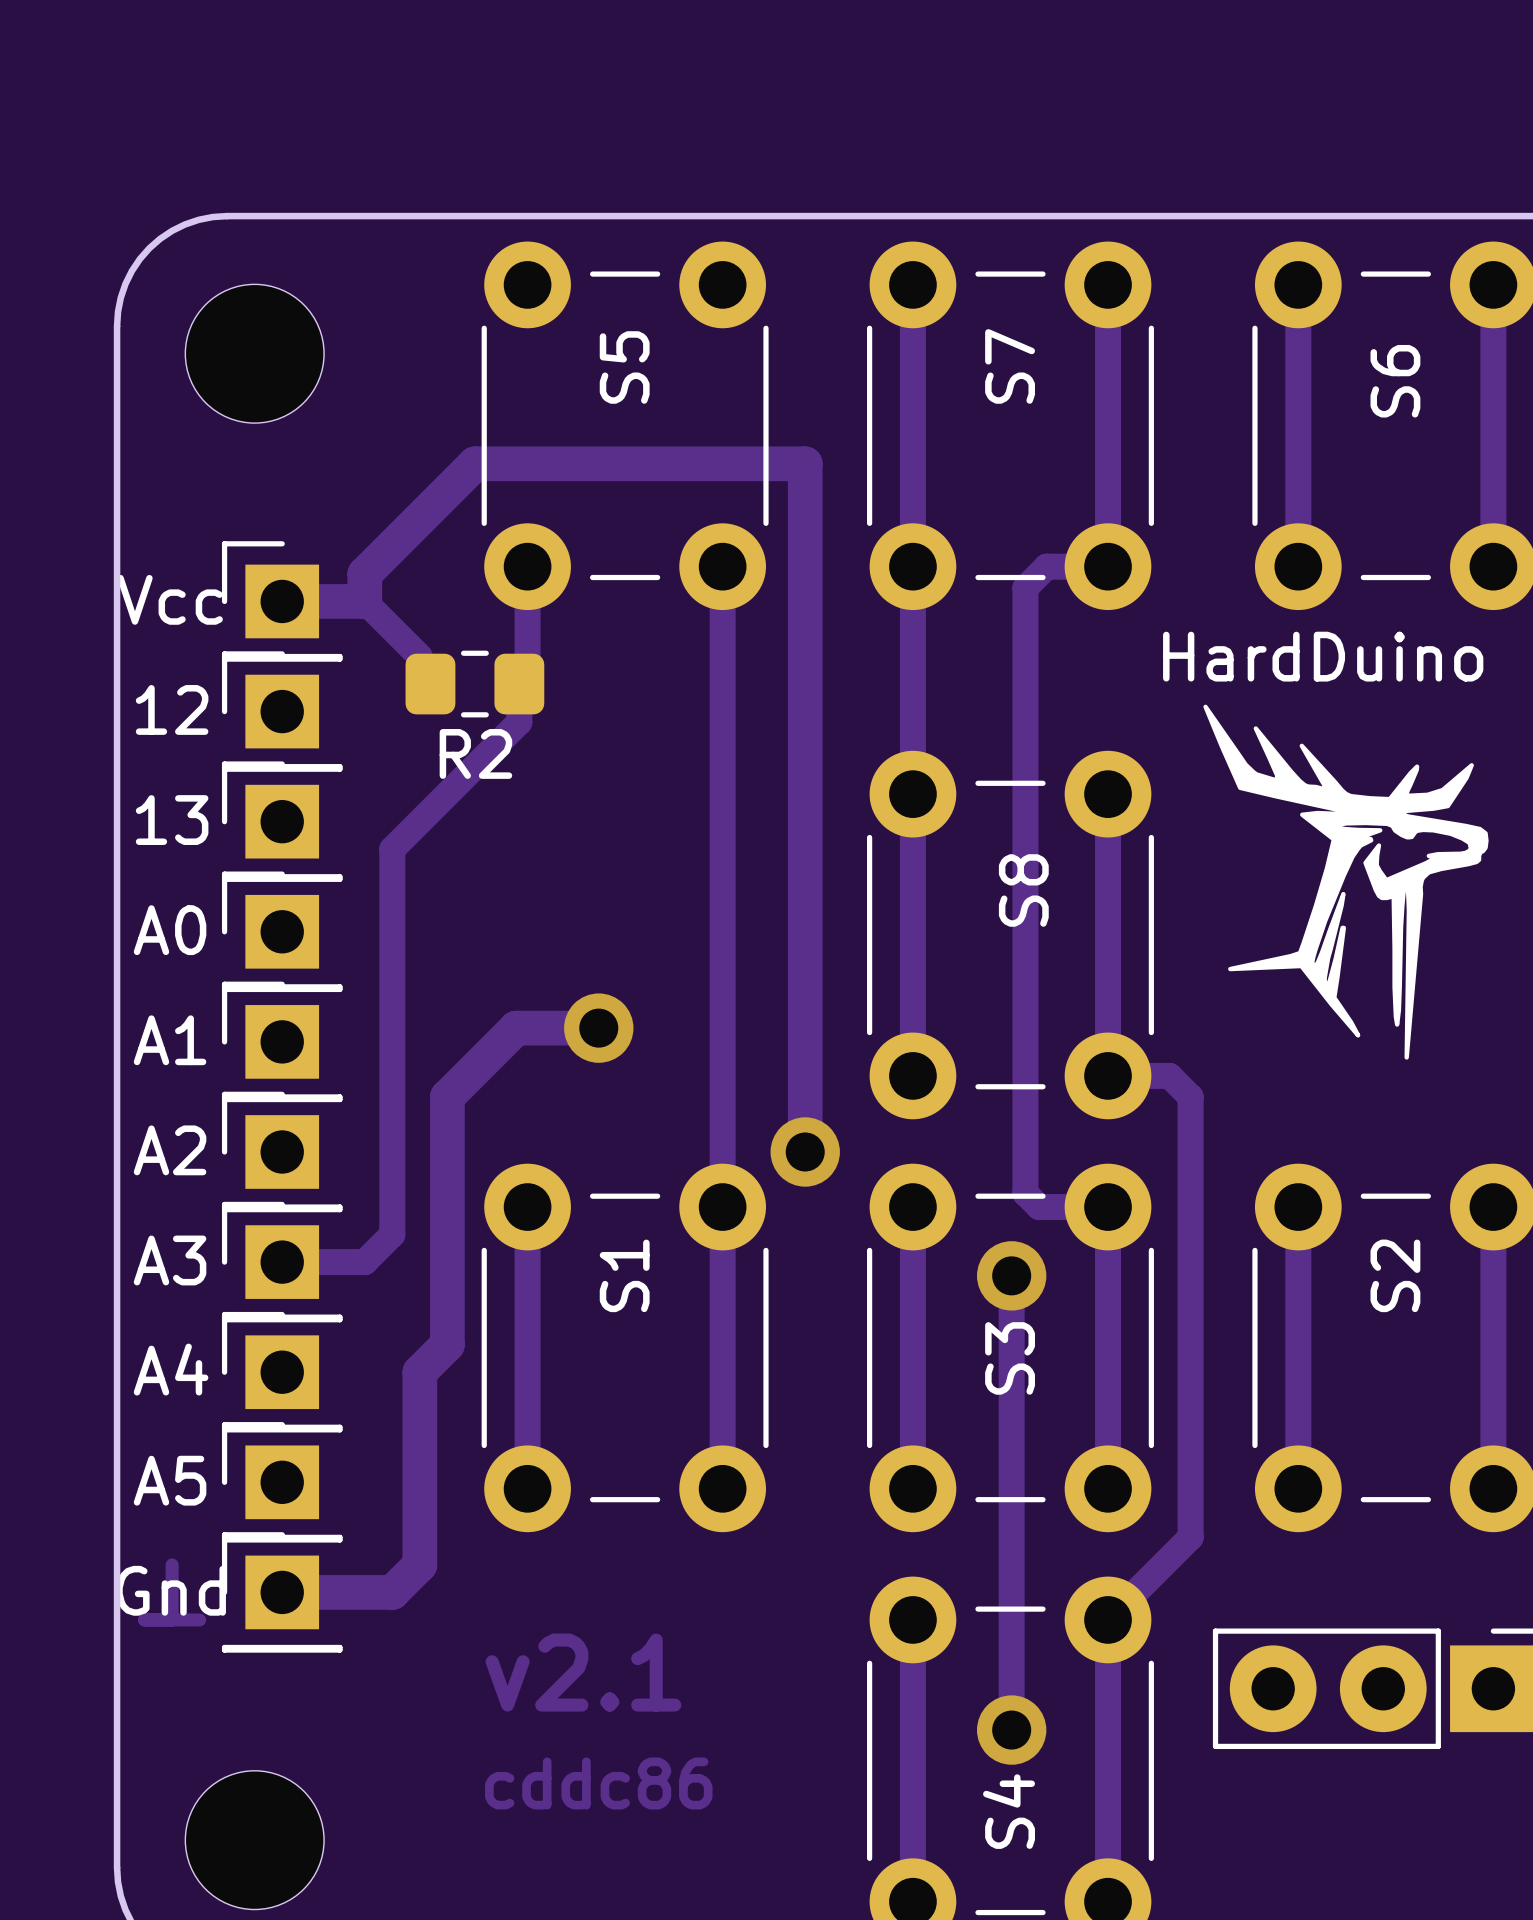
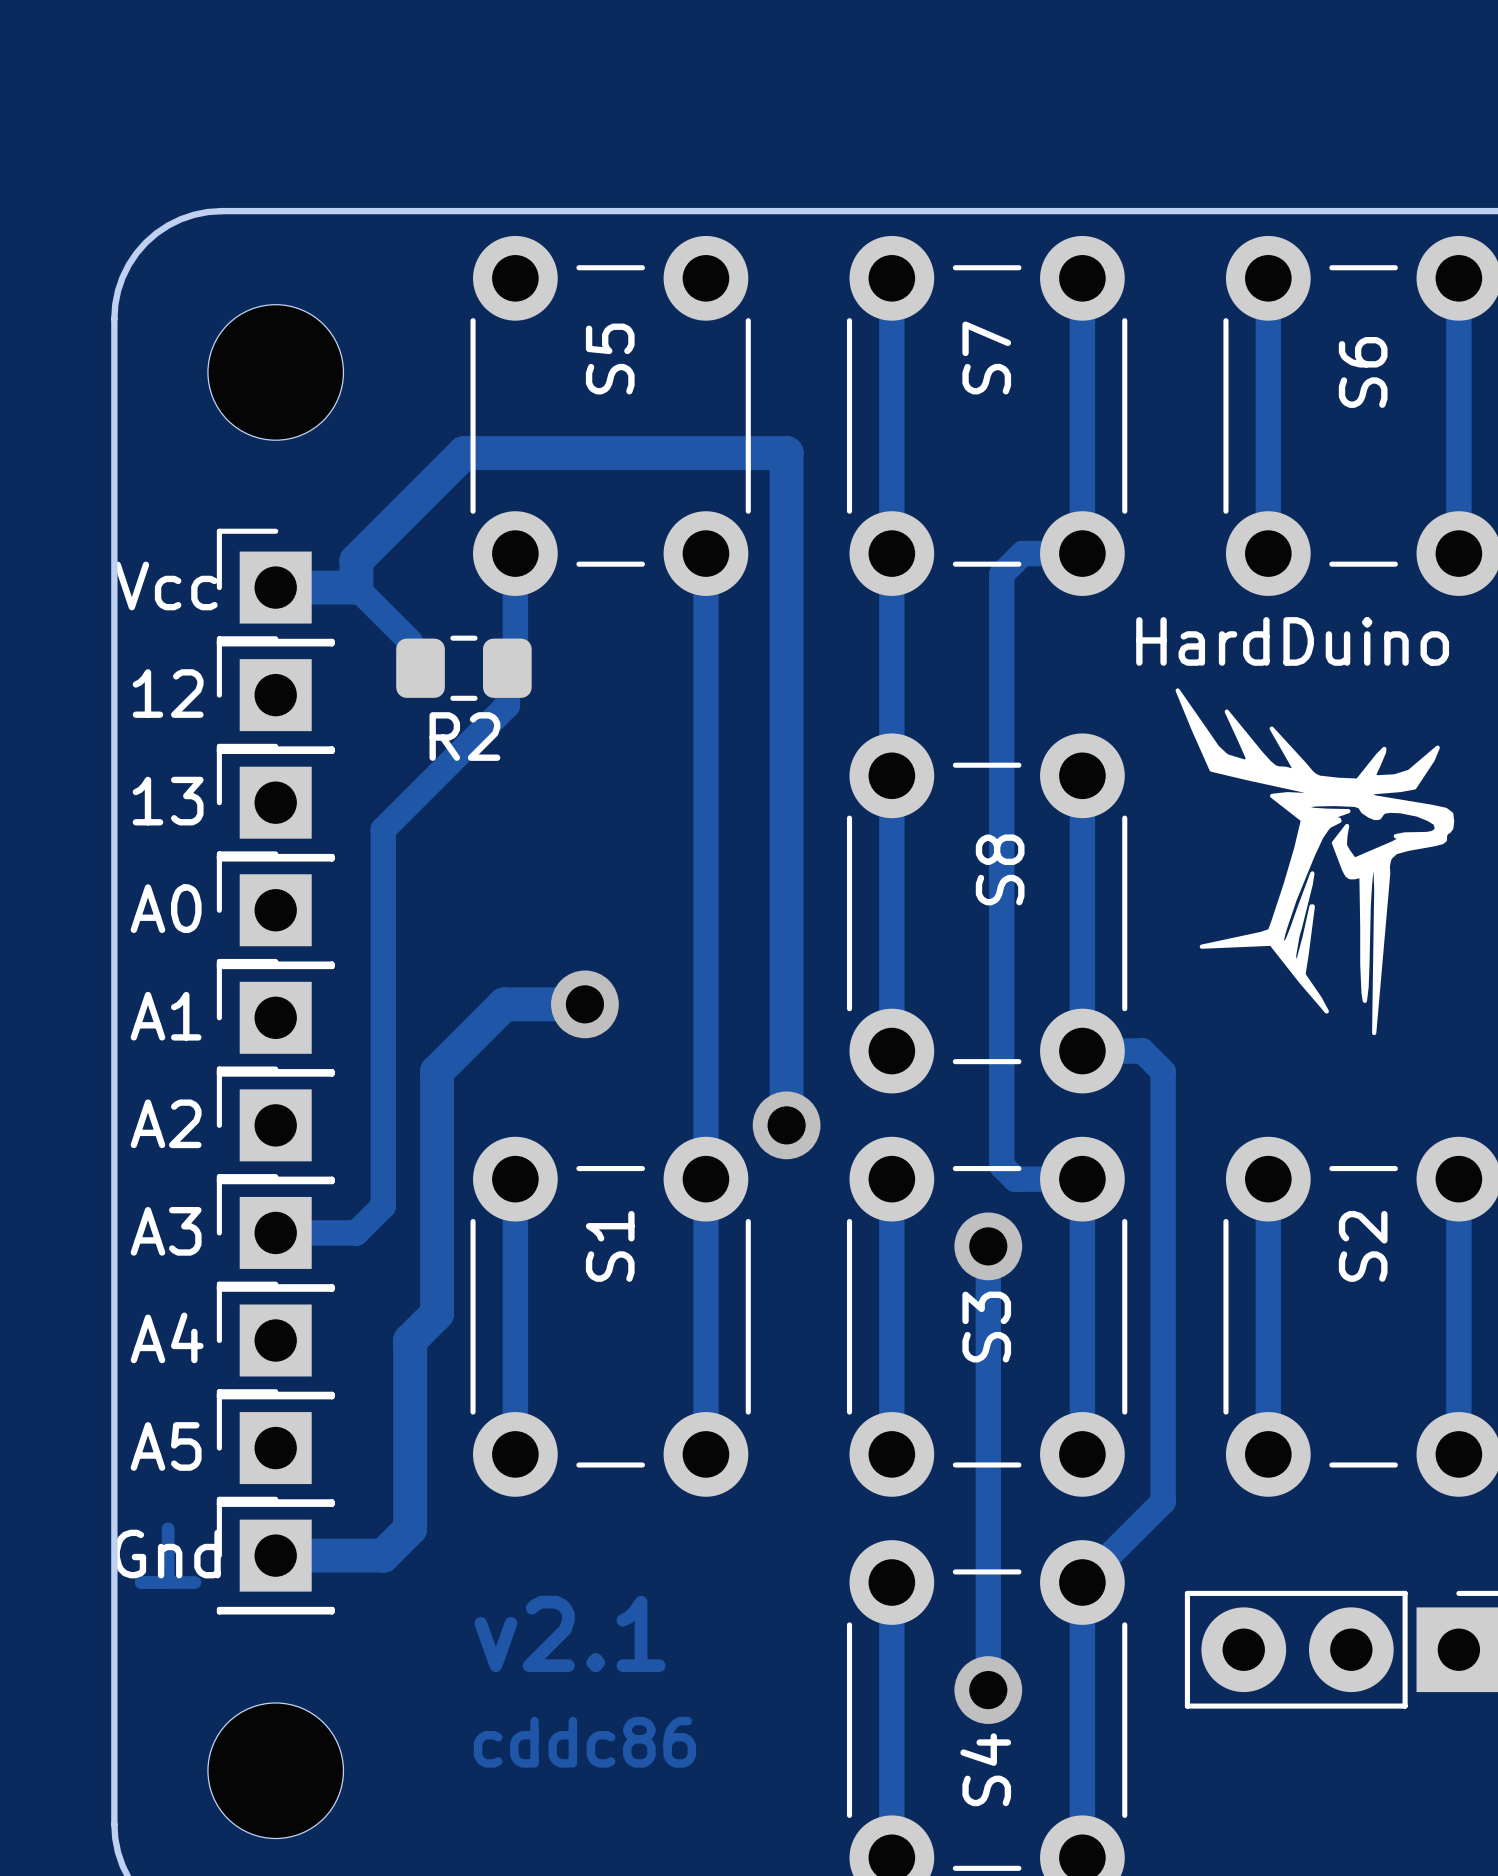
part position: (254, 353) -> (275, 372)
part position: (254, 1840) -> (275, 1770)

